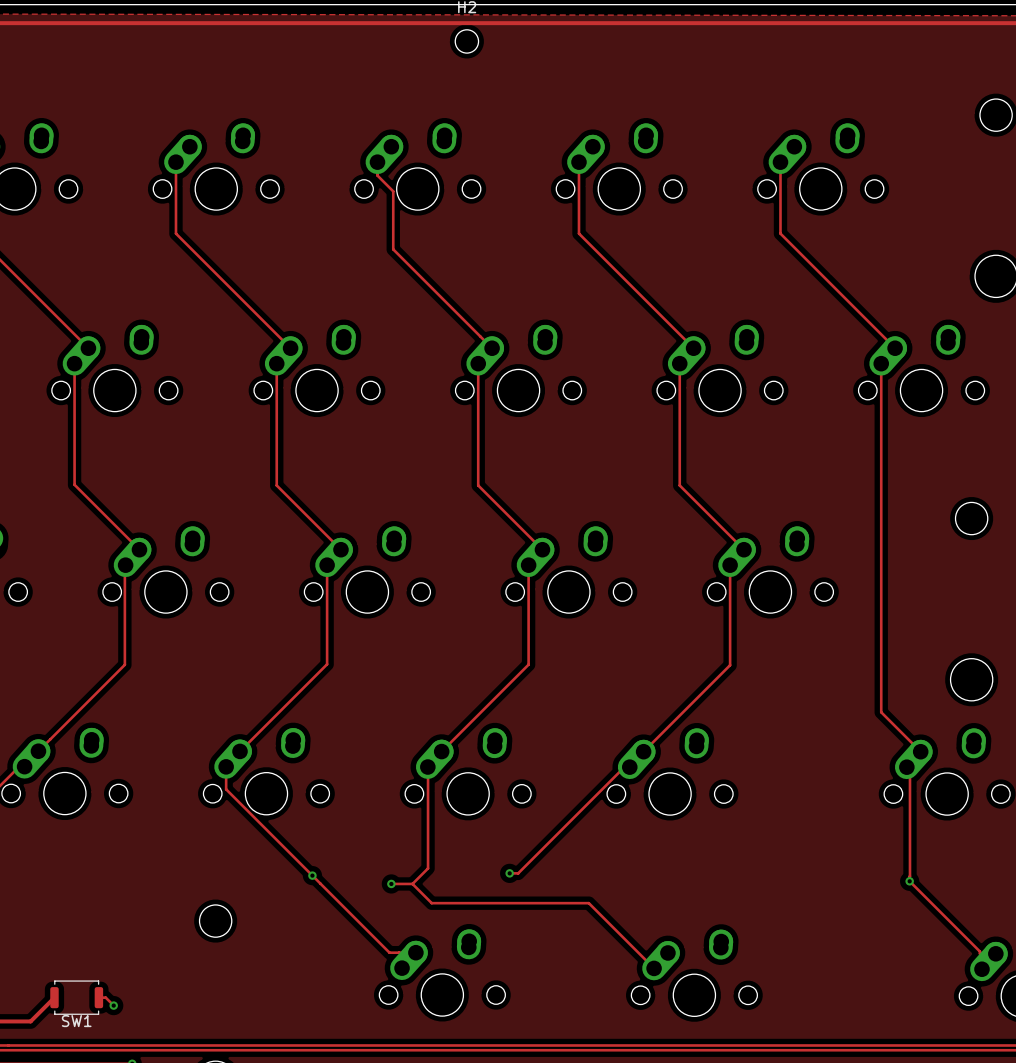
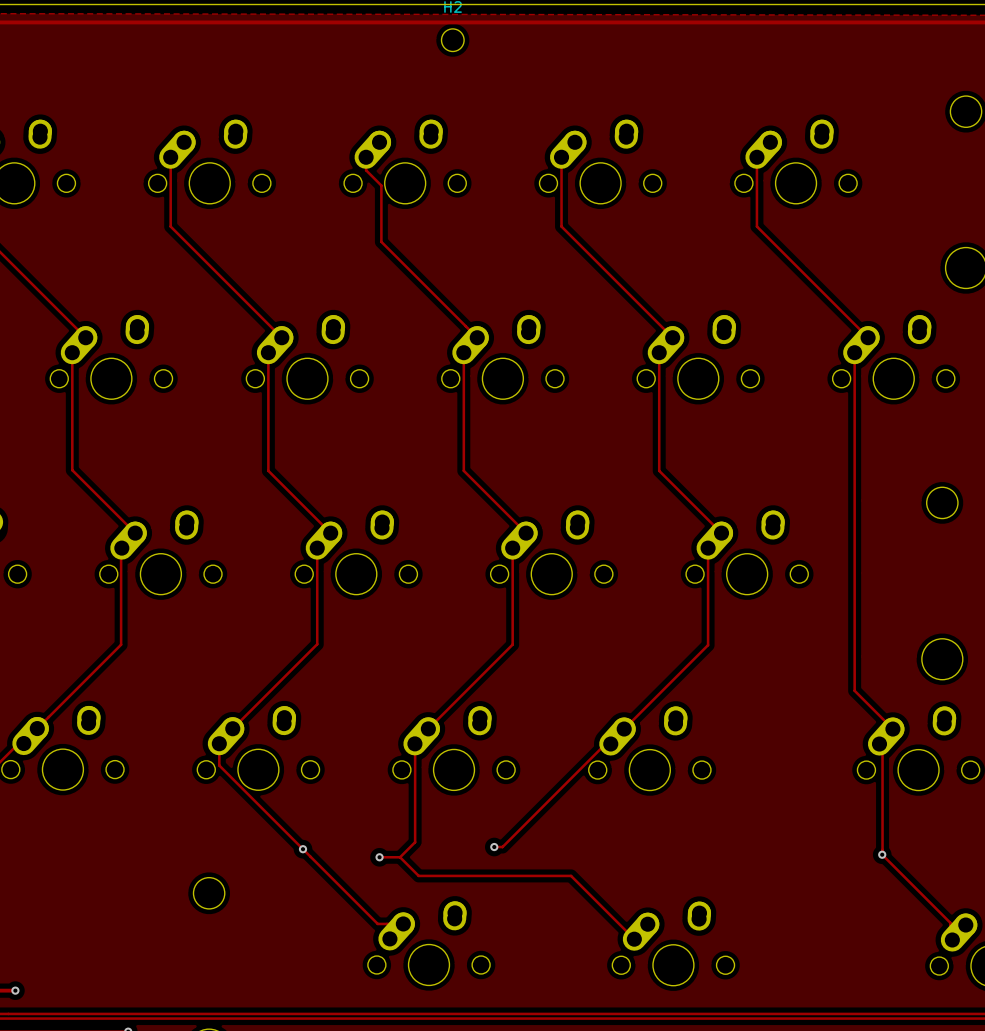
track: (54, 997) (30, 1021) (15, 1021) -> none
SW1: (76, 997) -> none
track: (98, 997) (105, 997) (113, 1005) -> none
via: (113, 1005) -> none
via: none -> (15, 990)

